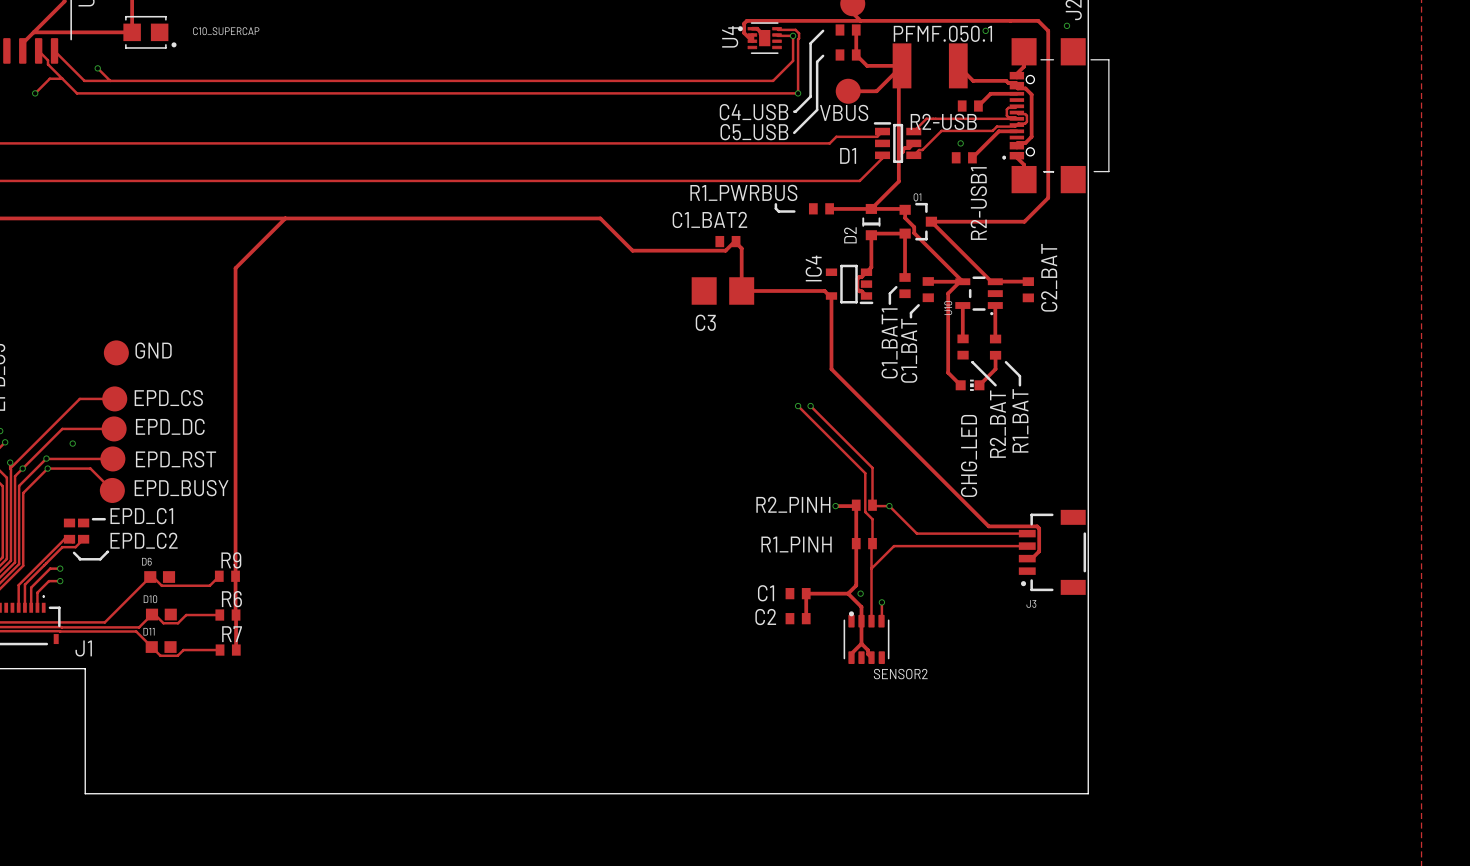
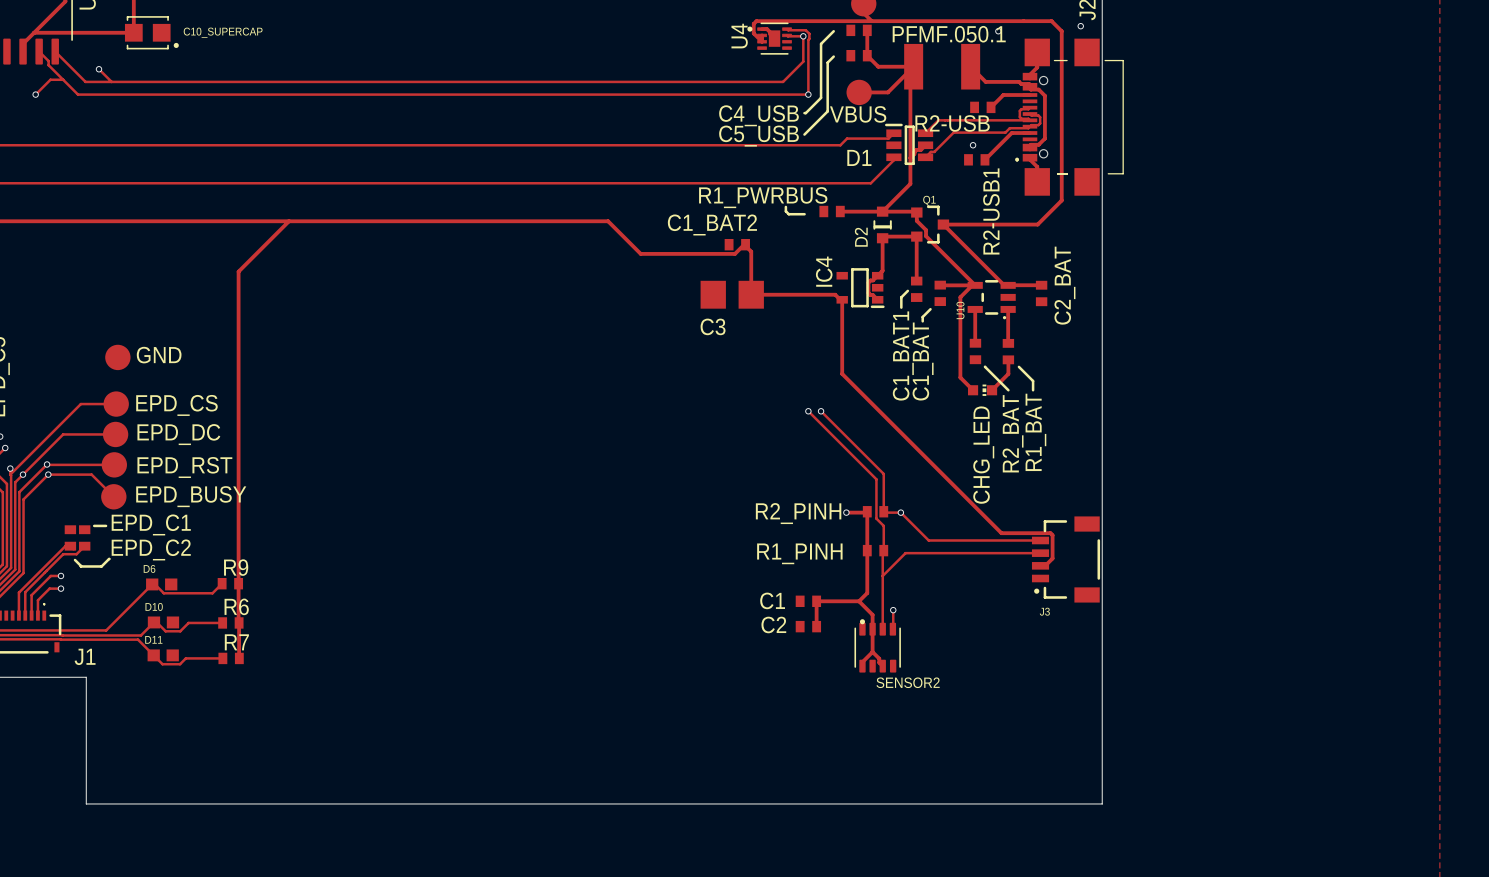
via: (72, 443) -> none
via: (860, 593) -> none

